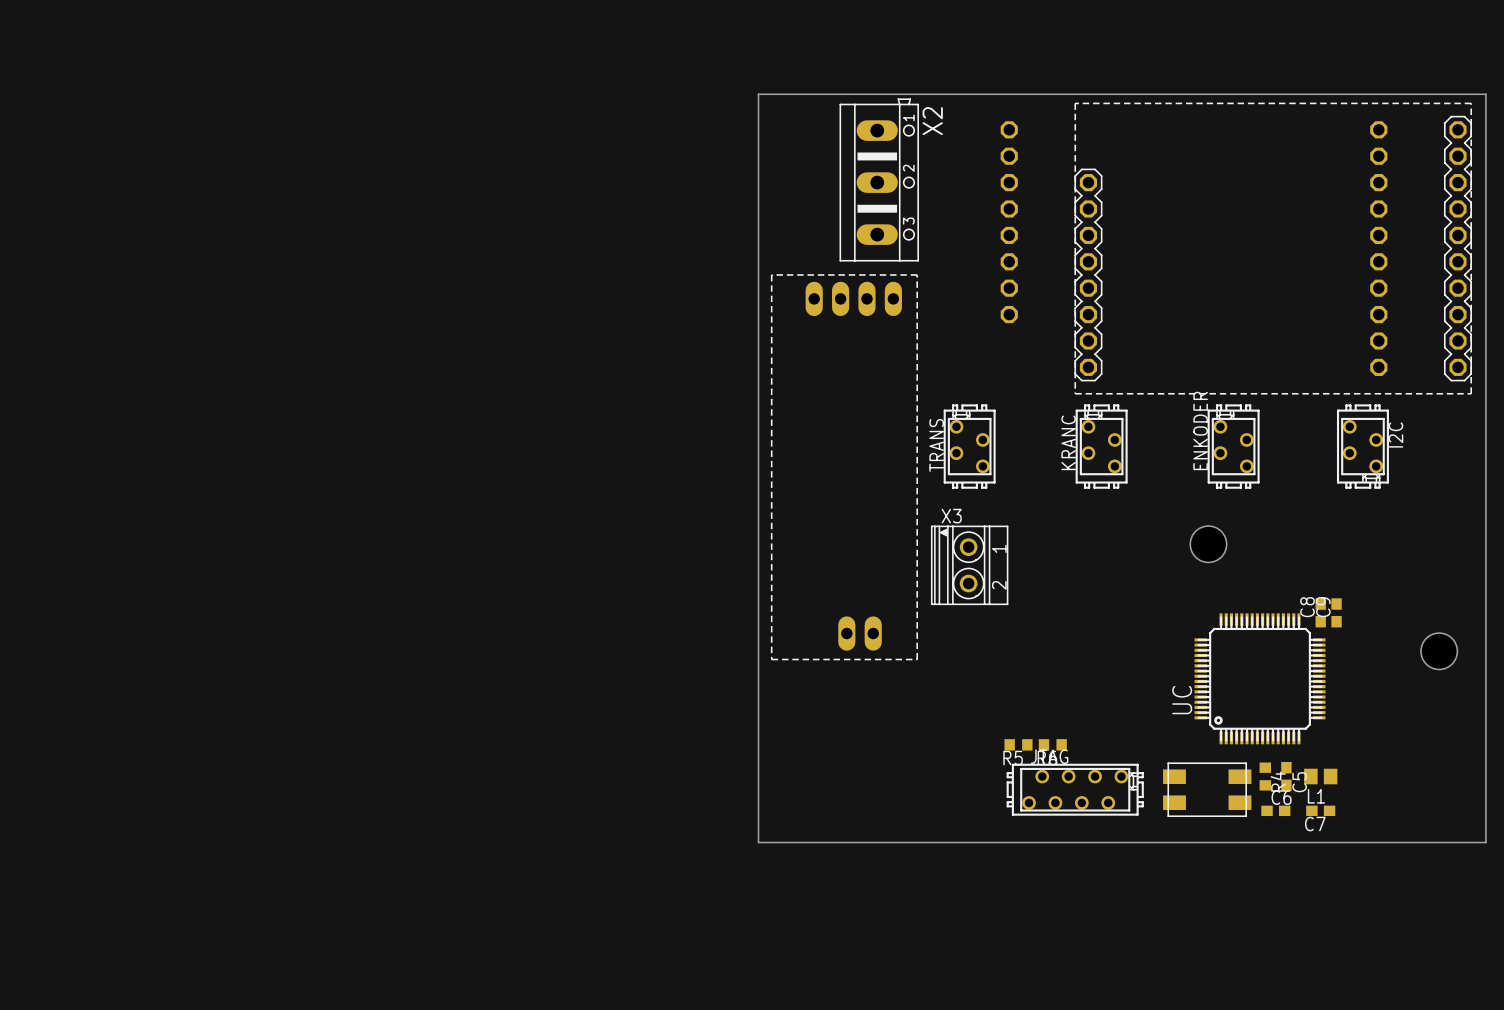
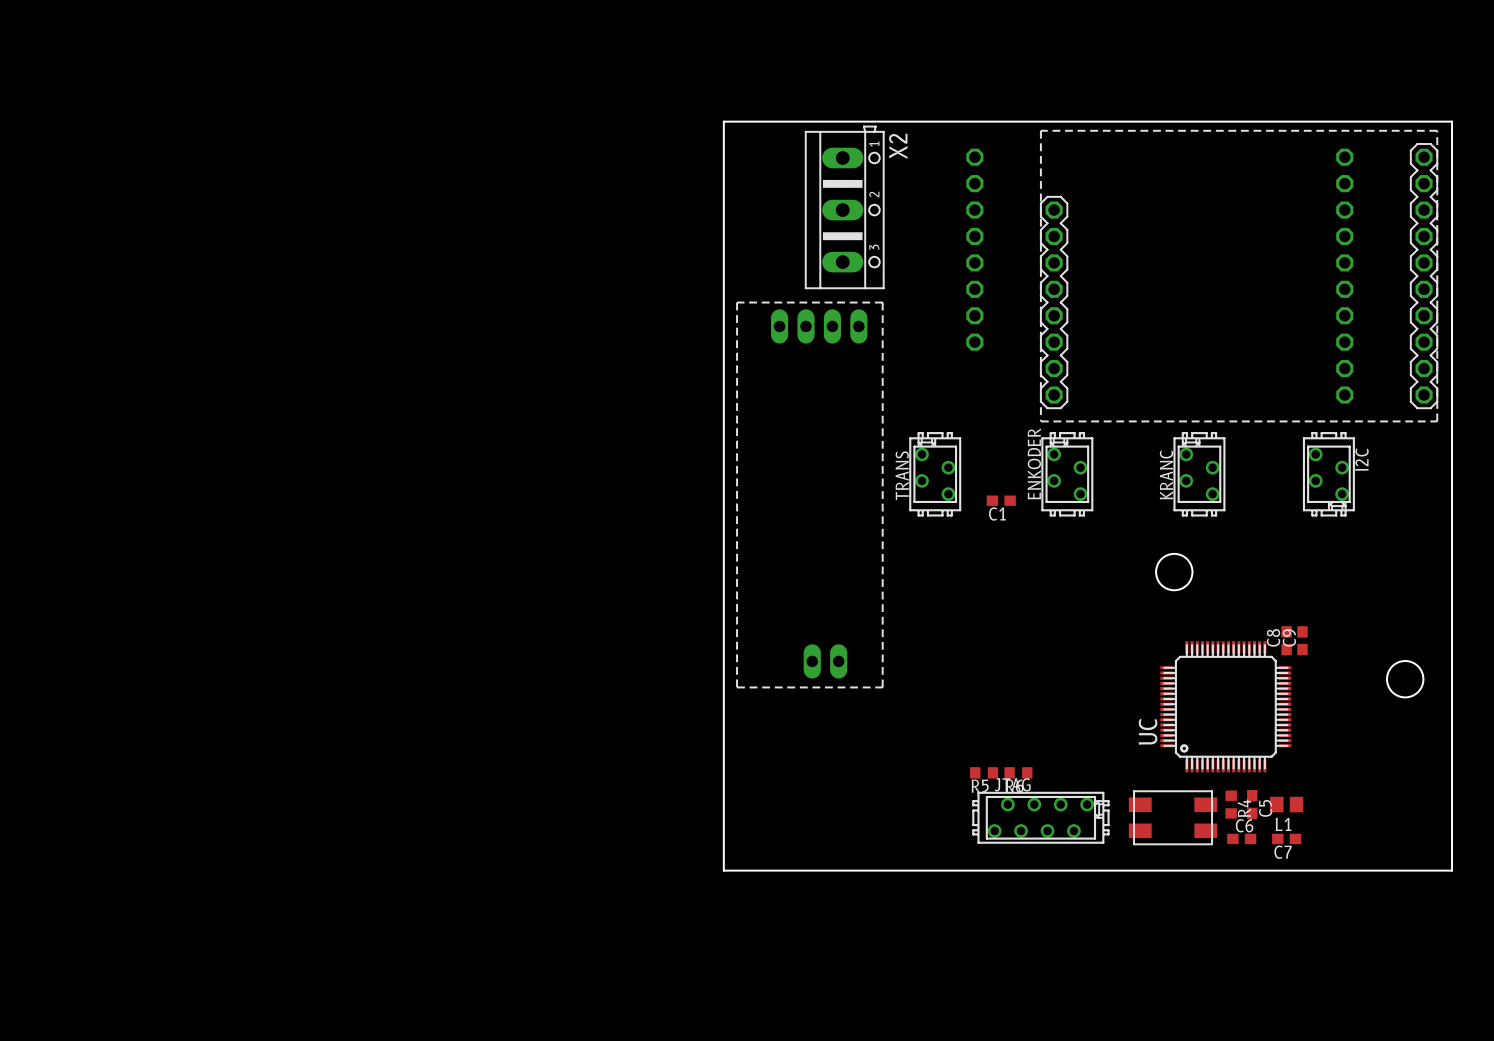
ENKODER name: ENKODER (1200, 430) -> KRANC (1166, 474)
KRANC name: KRANC (1068, 442) -> ENKODER (1034, 463)
C1: none -> (1001, 500)
X3: (969, 565) -> none

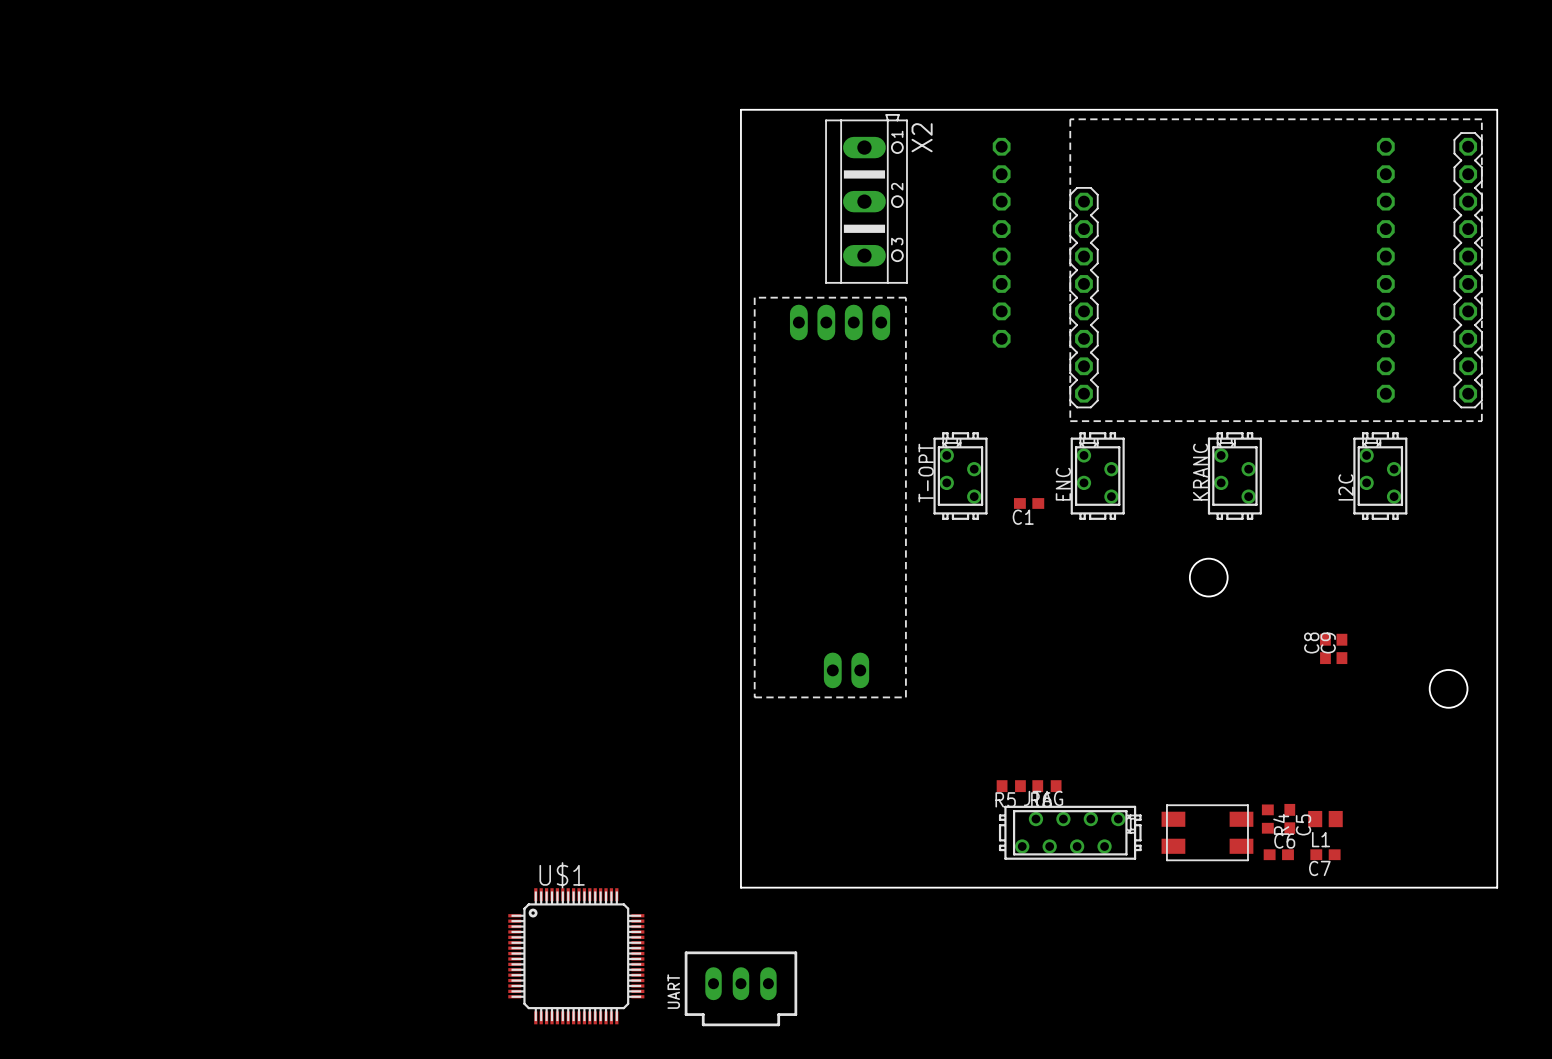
ENKODER name: ENKODER (1034, 463) -> ENC (1063, 484)
I2C rotation: 0° (1328, 474) -> 180° (1380, 476)
TRANS name: TRANS (902, 475) -> T-OPT (926, 473)
UC: (1225, 706) -> none
U$1: none -> (576, 956)
UART: none -> (740, 988)

